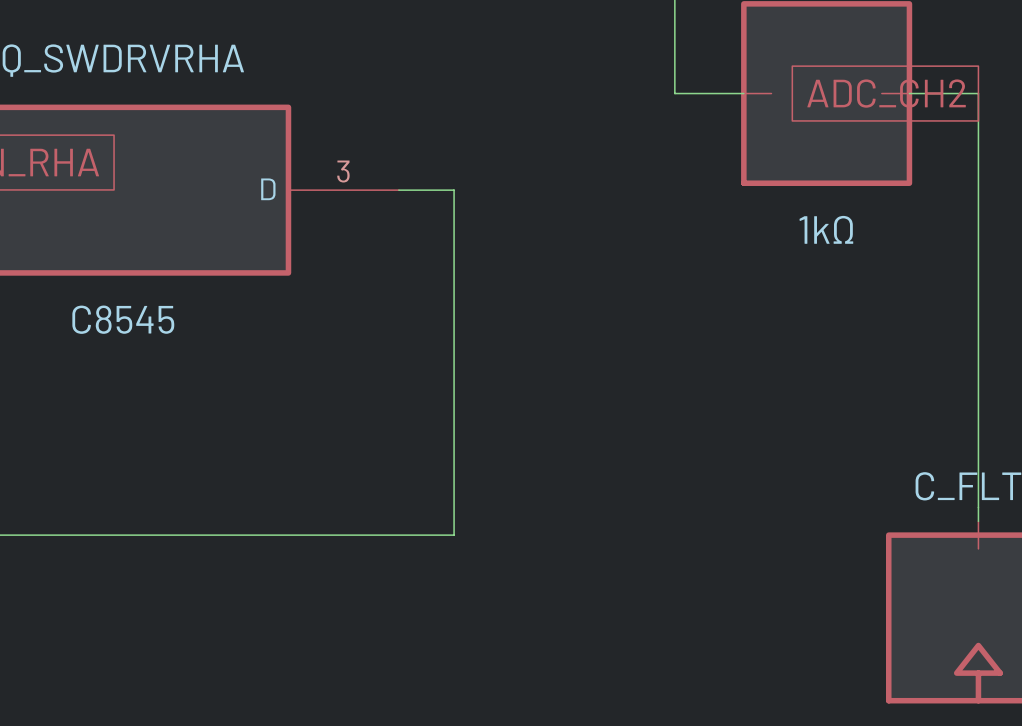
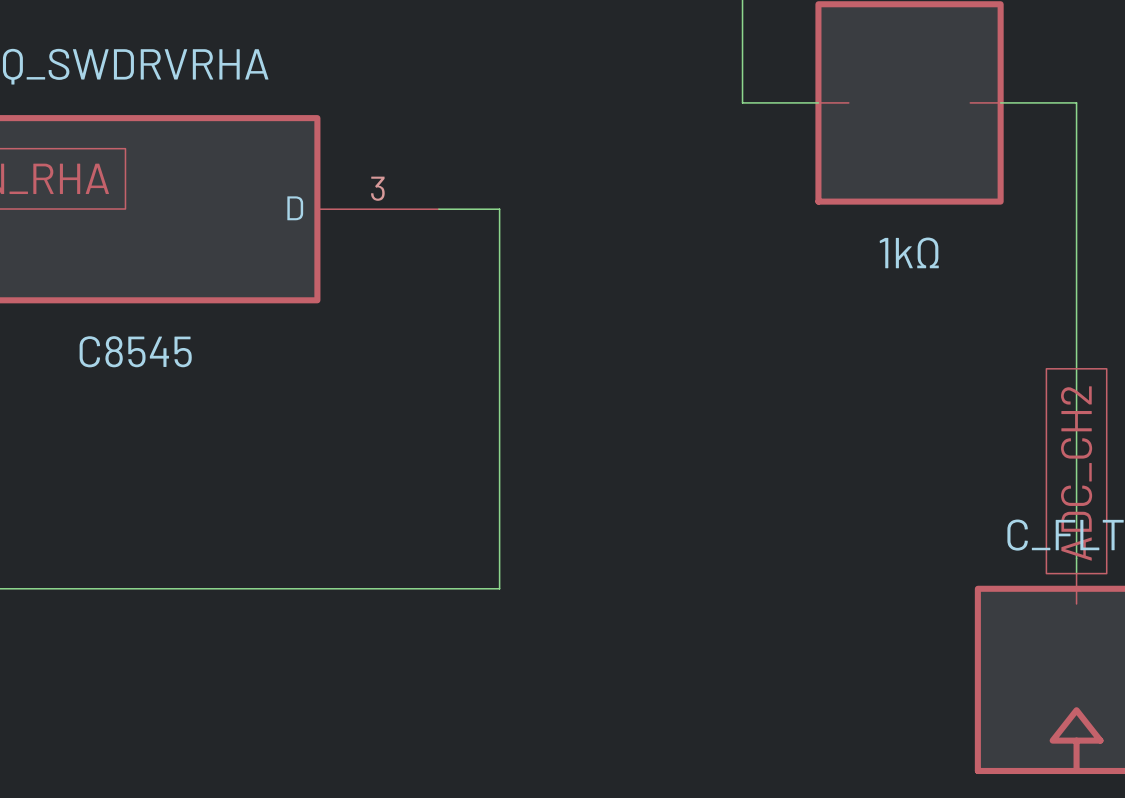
global label rotation: 0° (886, 93) -> 90° clockwise (1076, 473)
global label position: ADC_CH2 (886, 93) -> ADC_CH2 (1076, 473)

